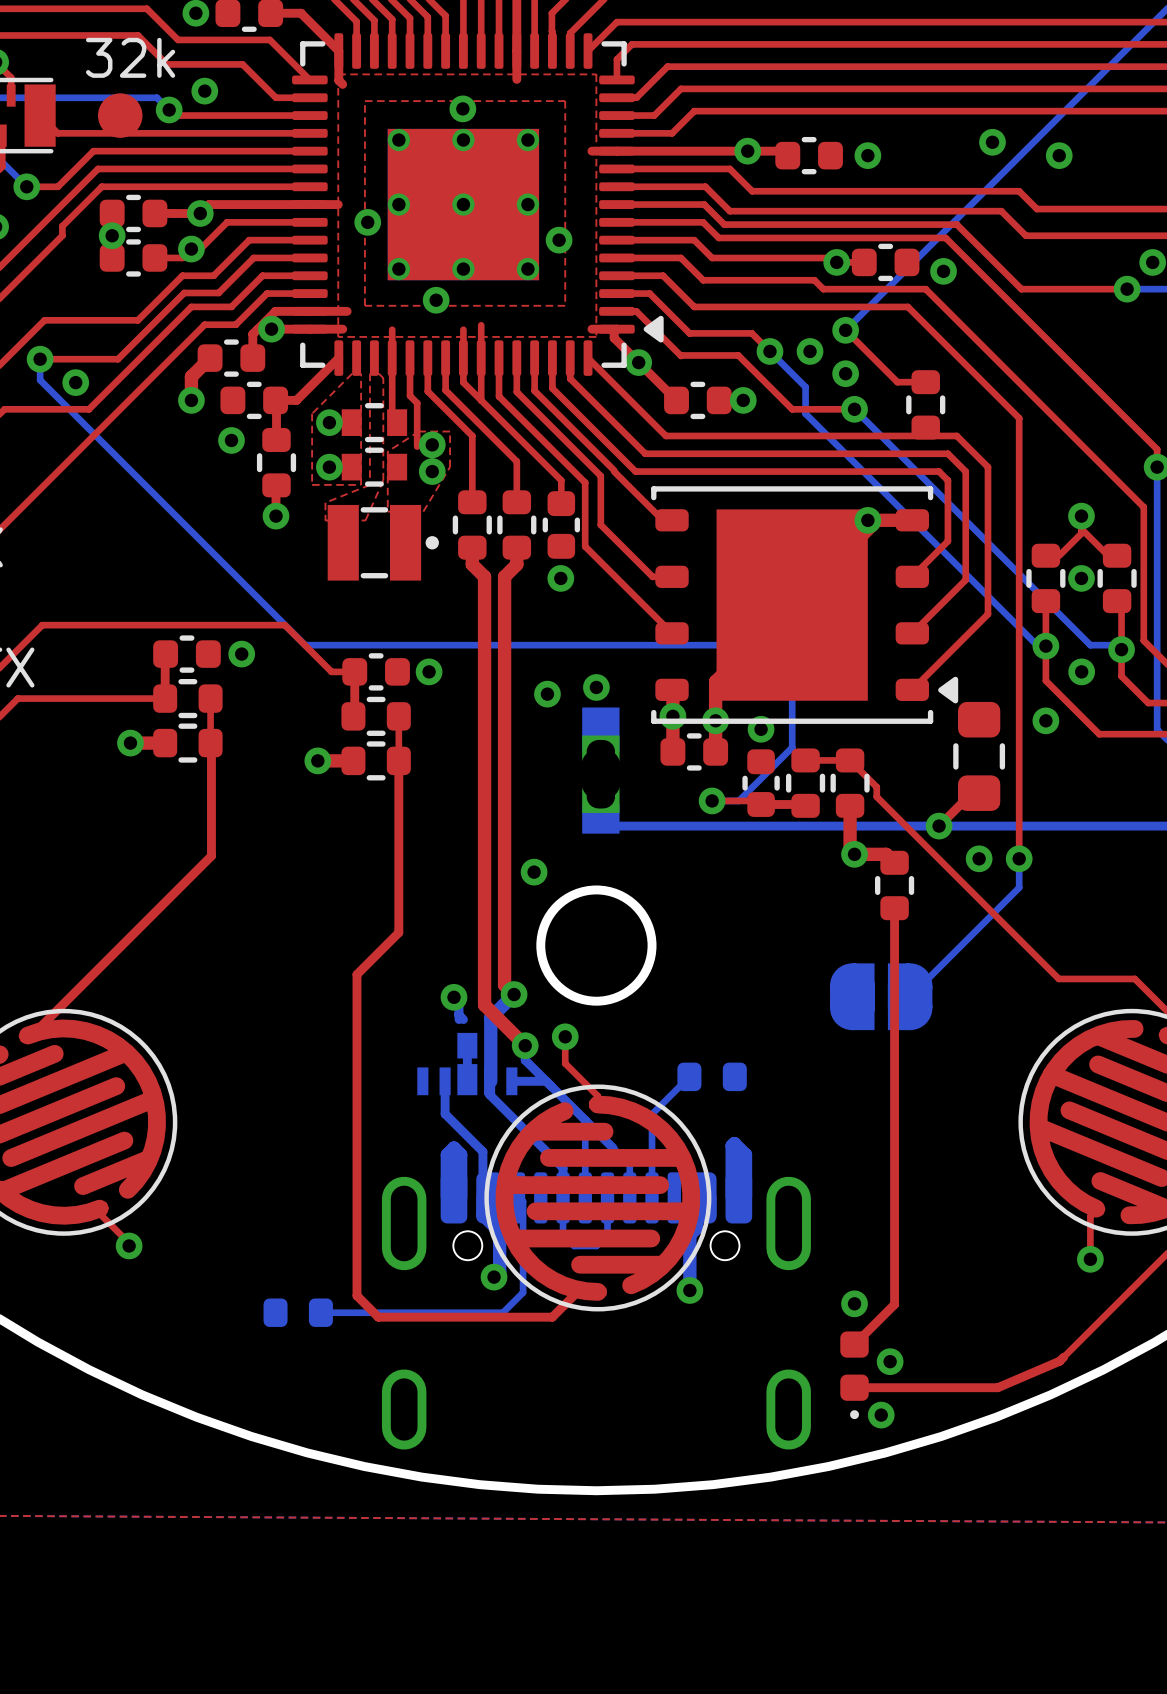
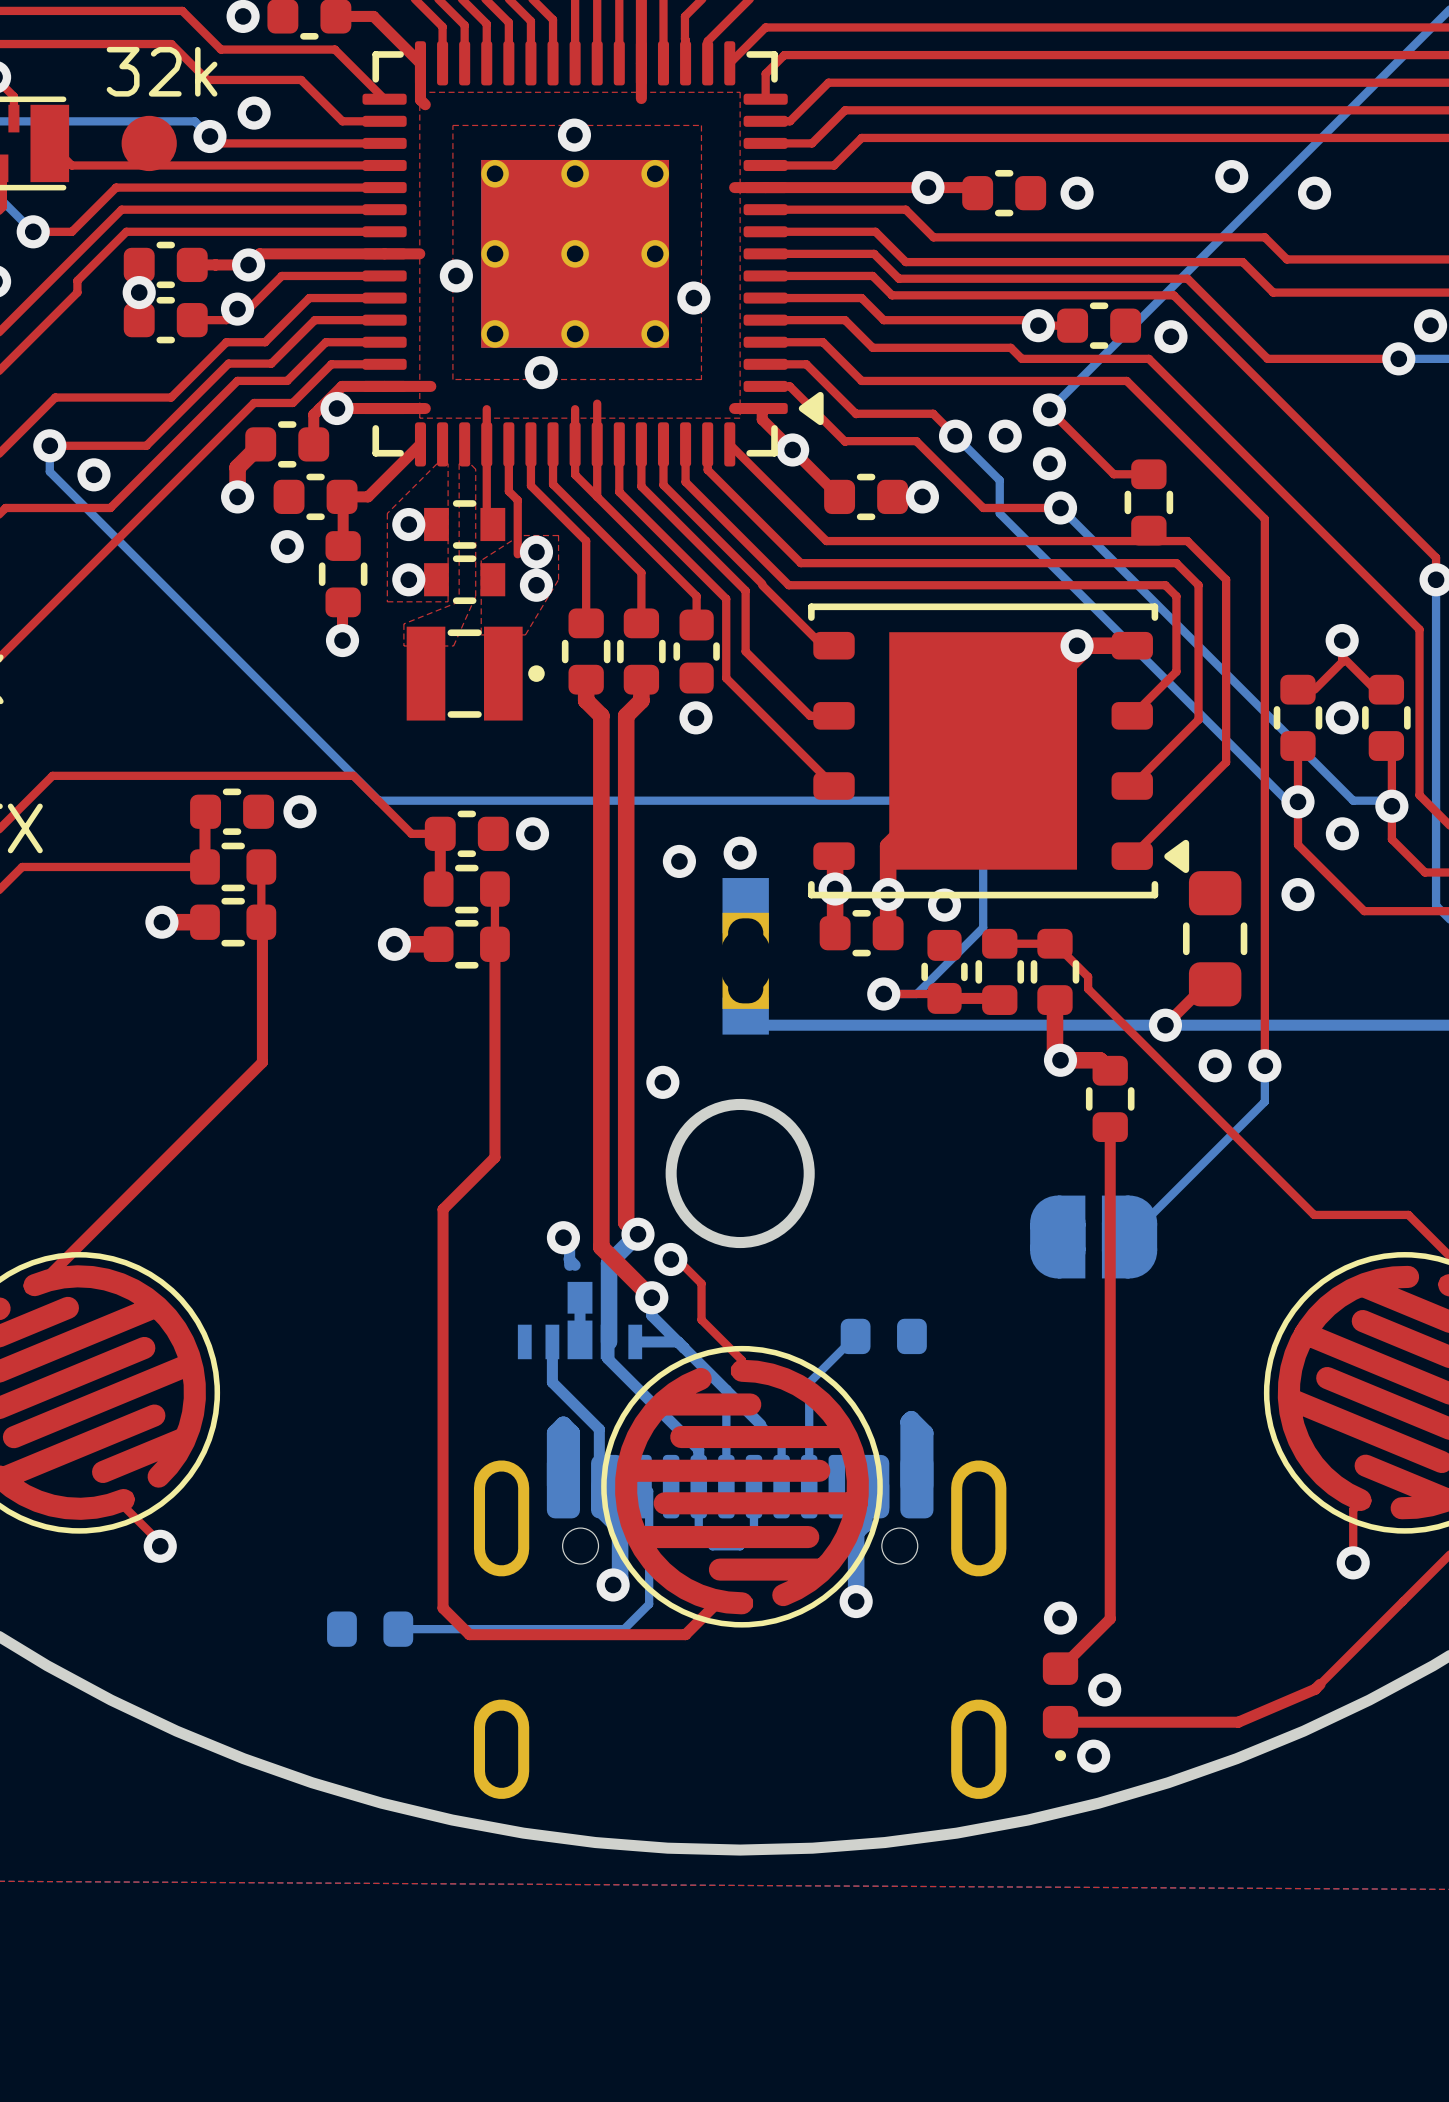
top track: none -> (670, 1259) (677, 1259) (701, 1283) (701, 1286)
via position: (565, 1036) -> (670, 1259)

